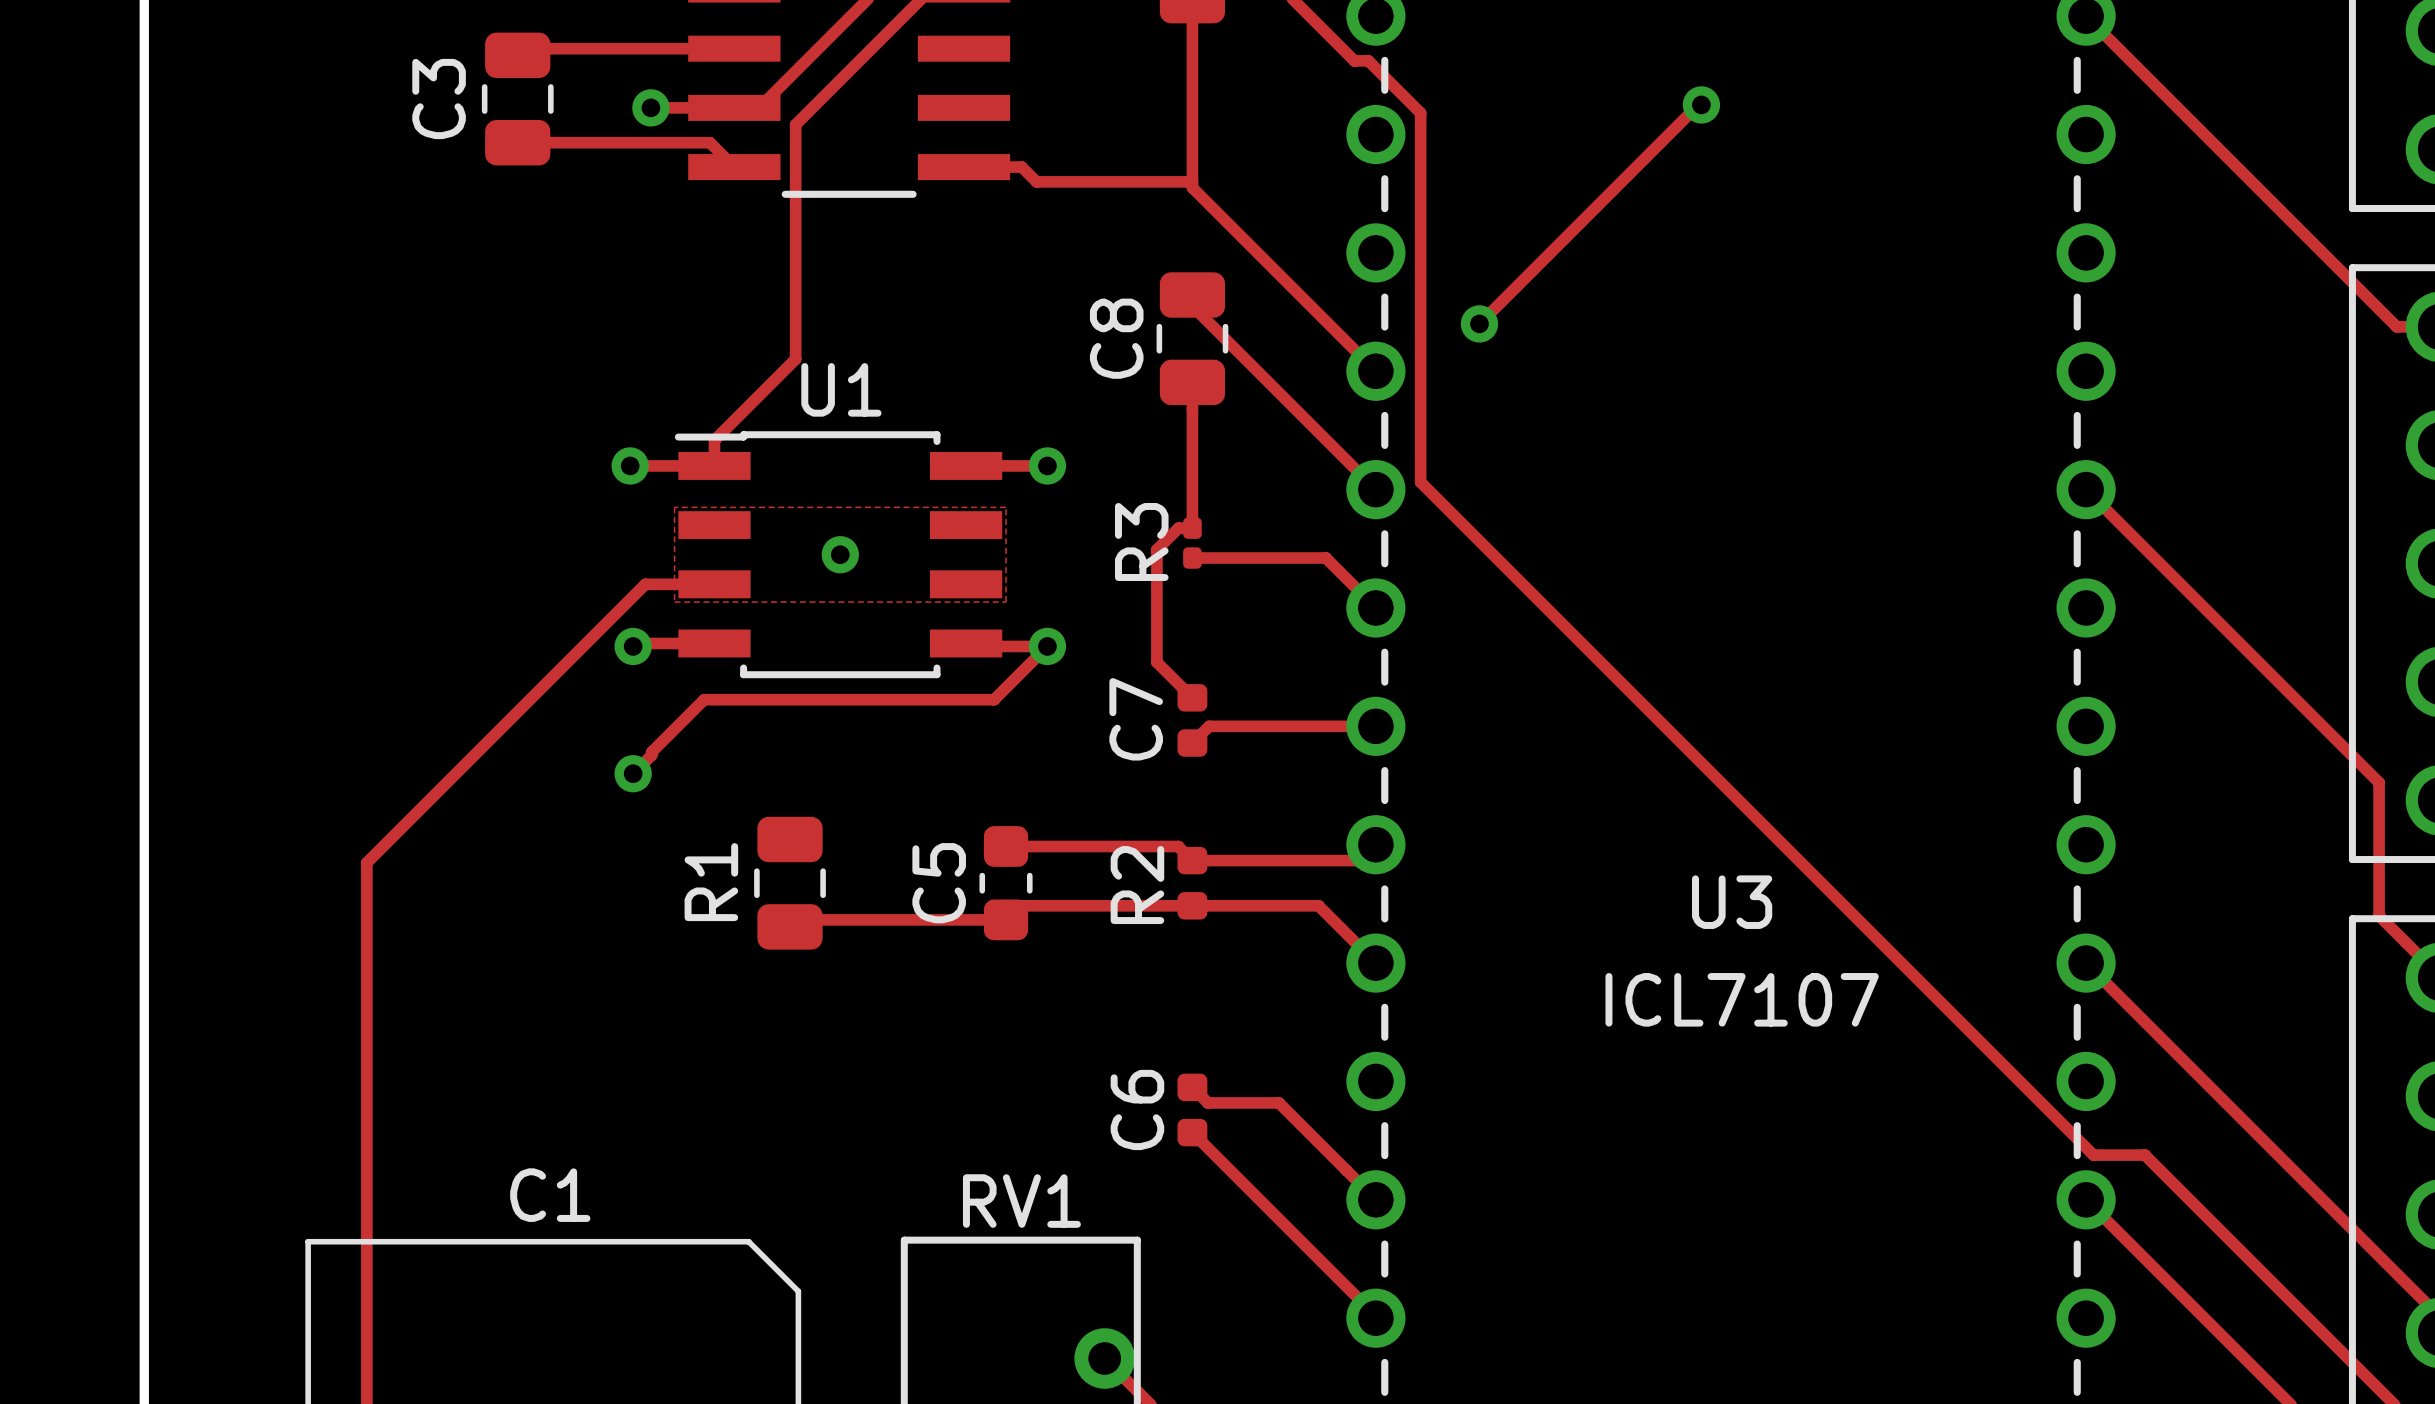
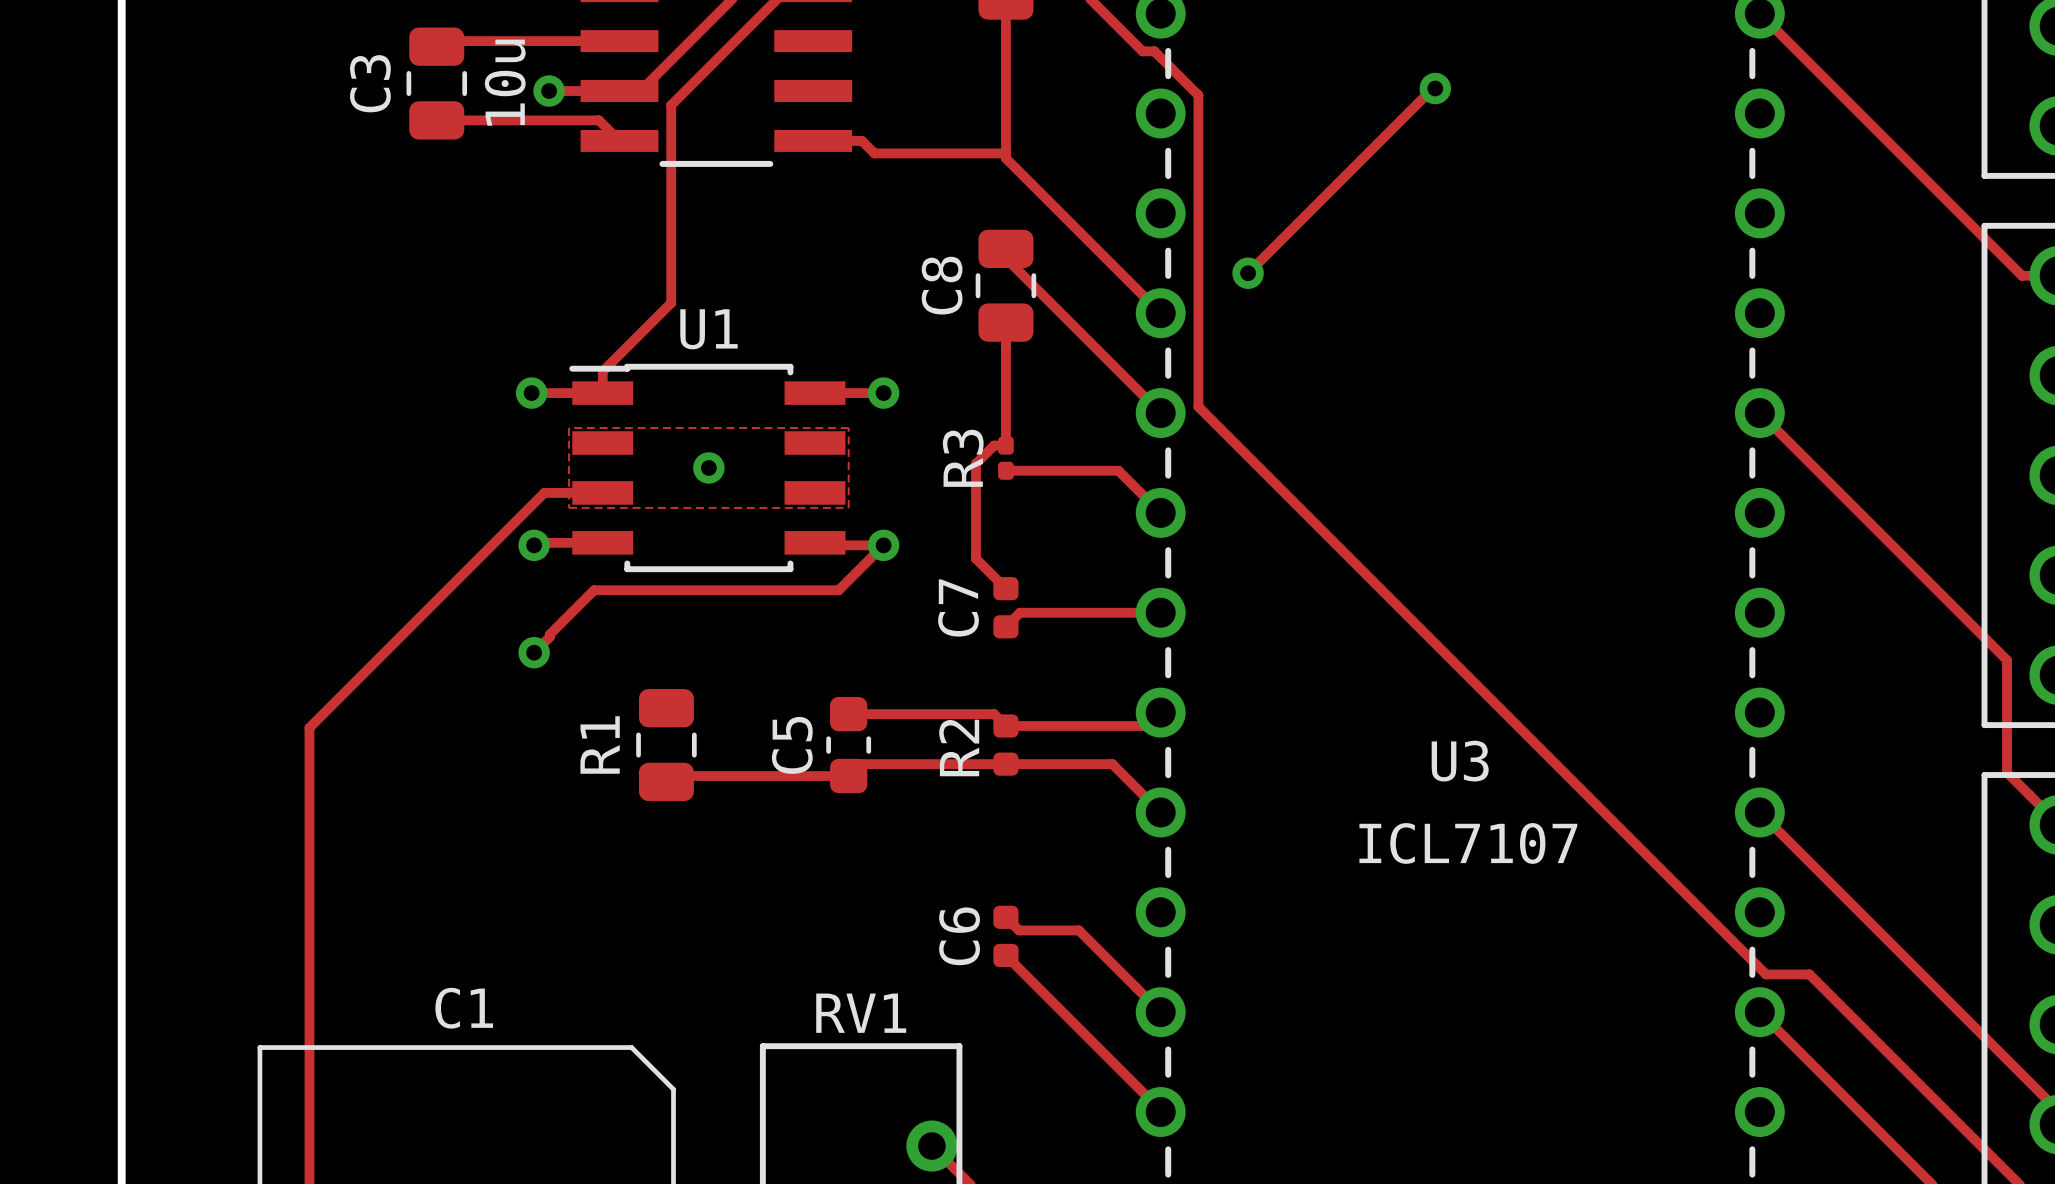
C3 value: none -> 10u (505, 82)

